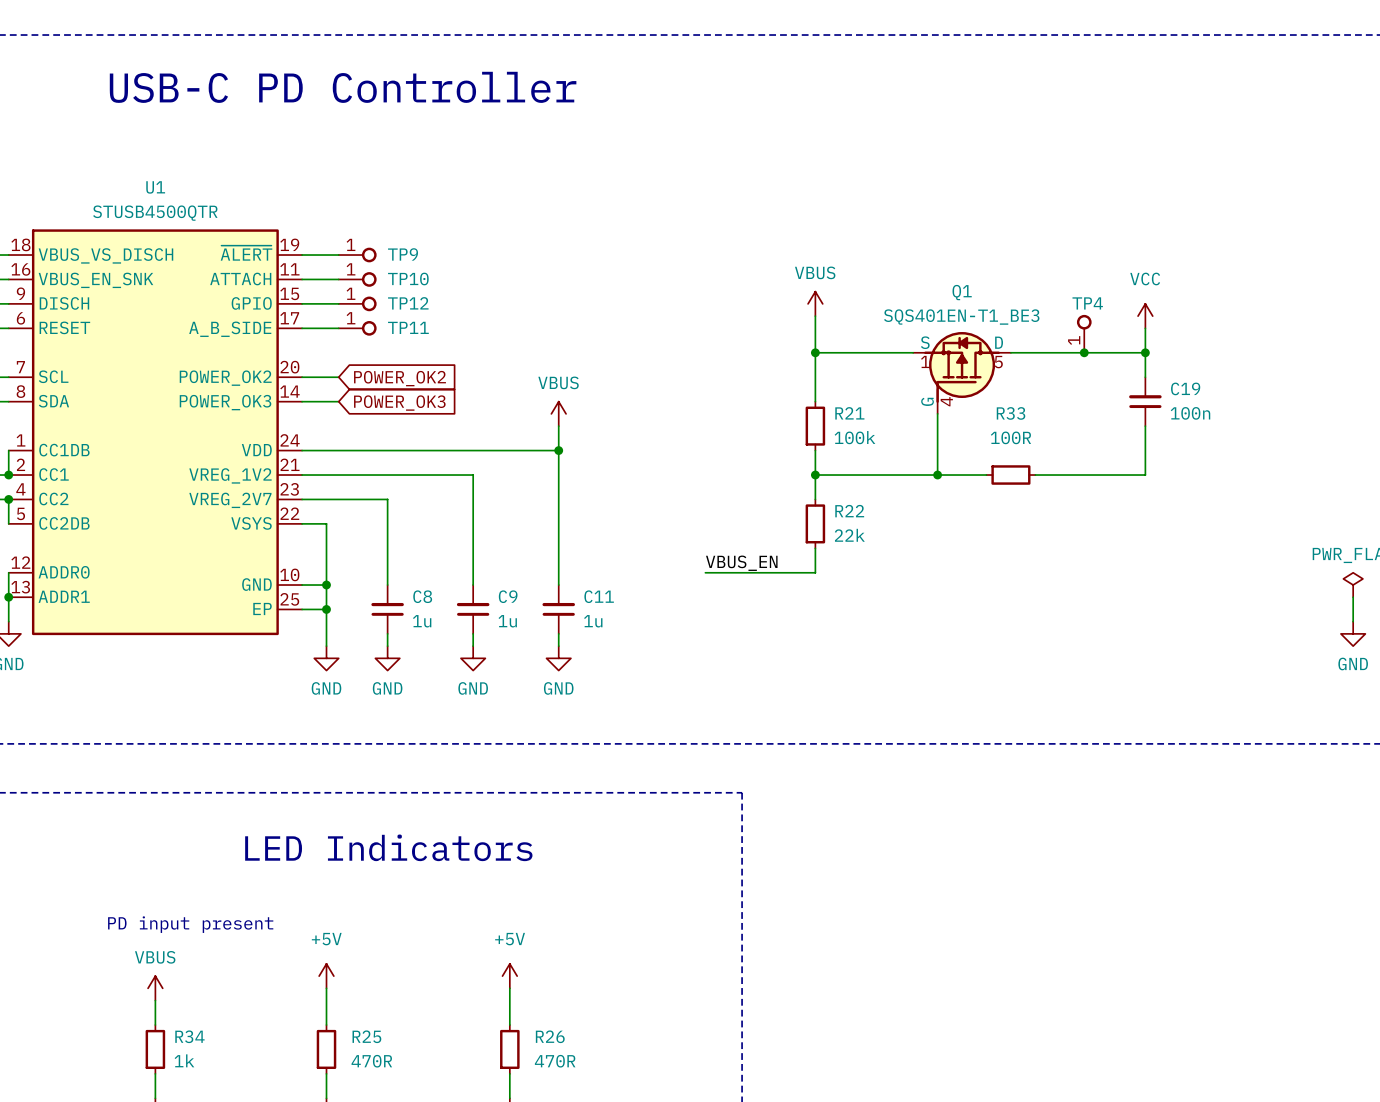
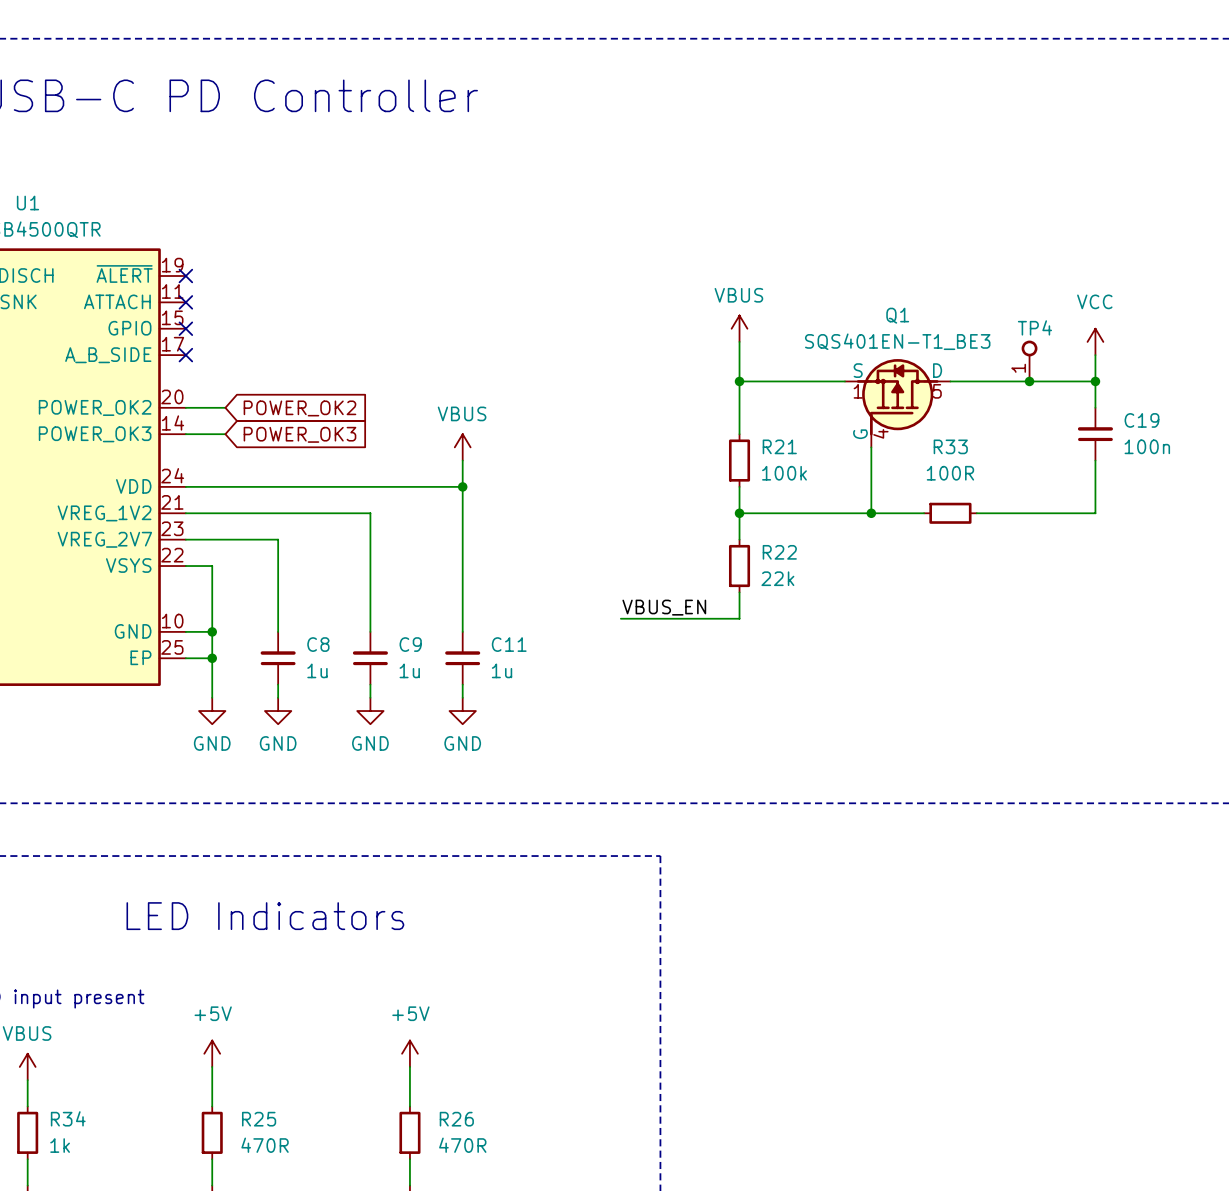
wire: (302, 255) (338, 255) -> none
no-connect mark: none -> (185, 276)
TP9: (357, 255) -> none
wire: (302, 279) (338, 279) -> none
no-connect mark: none -> (185, 302)
TP10: (357, 279) -> none
wire: (302, 303) (338, 303) -> none
no-connect mark: none -> (185, 328)
TP12: (357, 303) -> none
wire: (302, 328) (338, 328) -> none
no-connect mark: none -> (185, 355)
TP11: (357, 328) -> none

